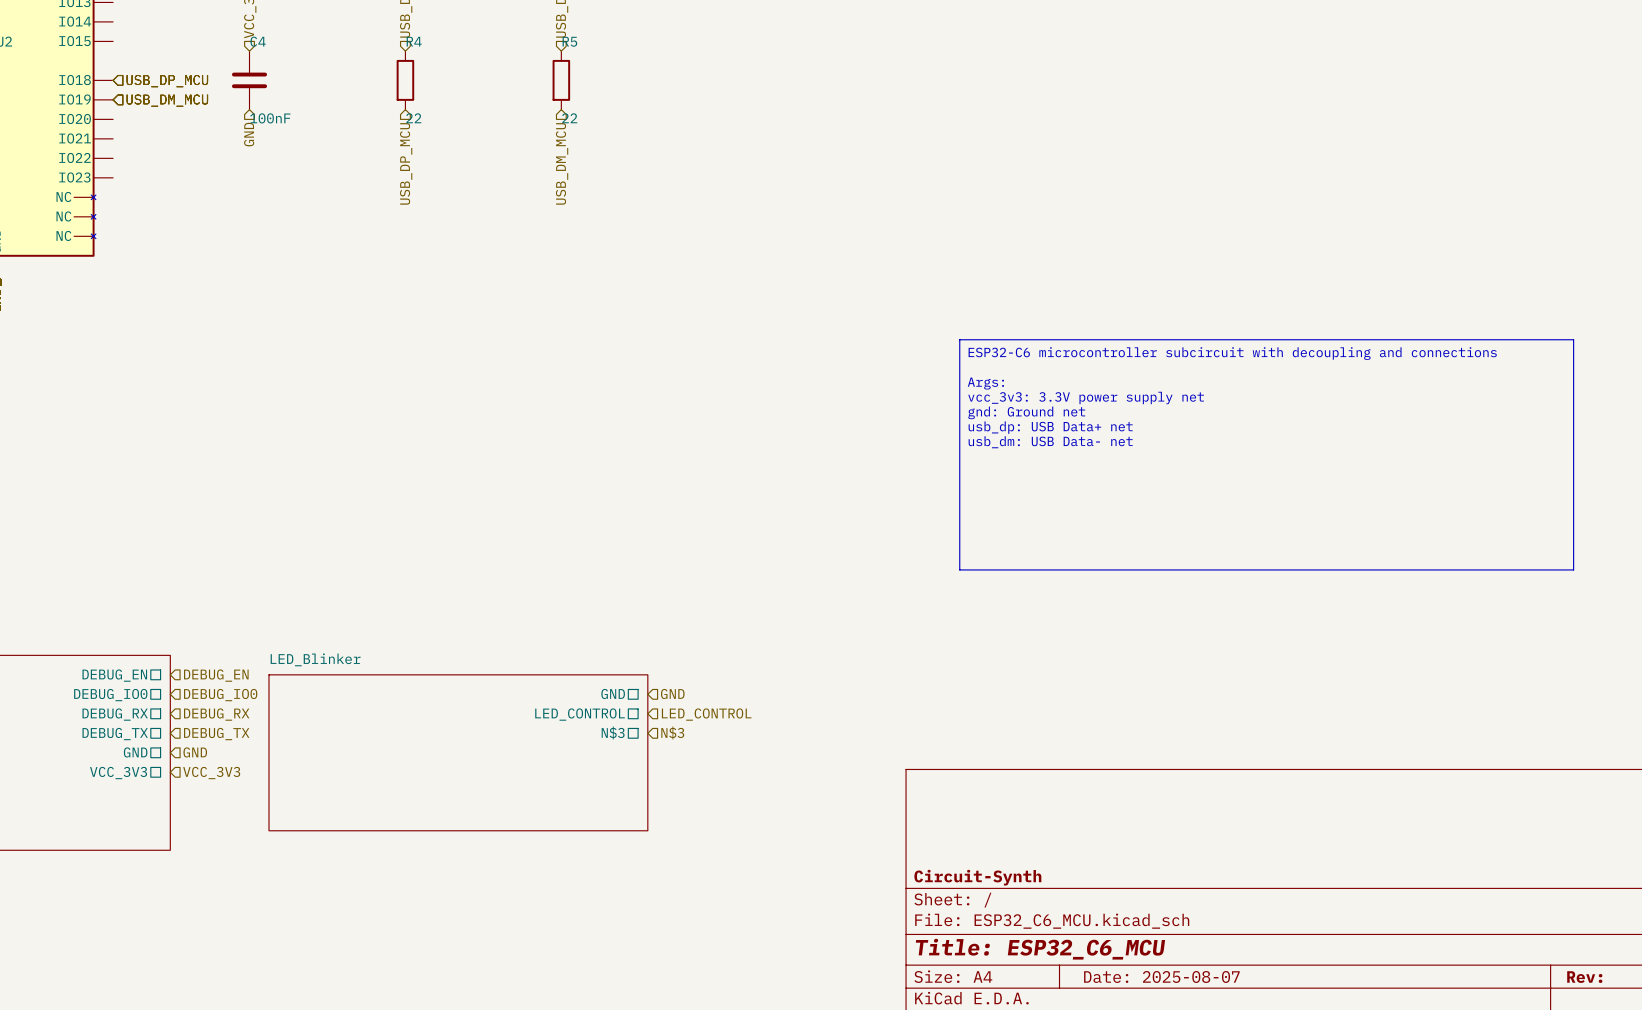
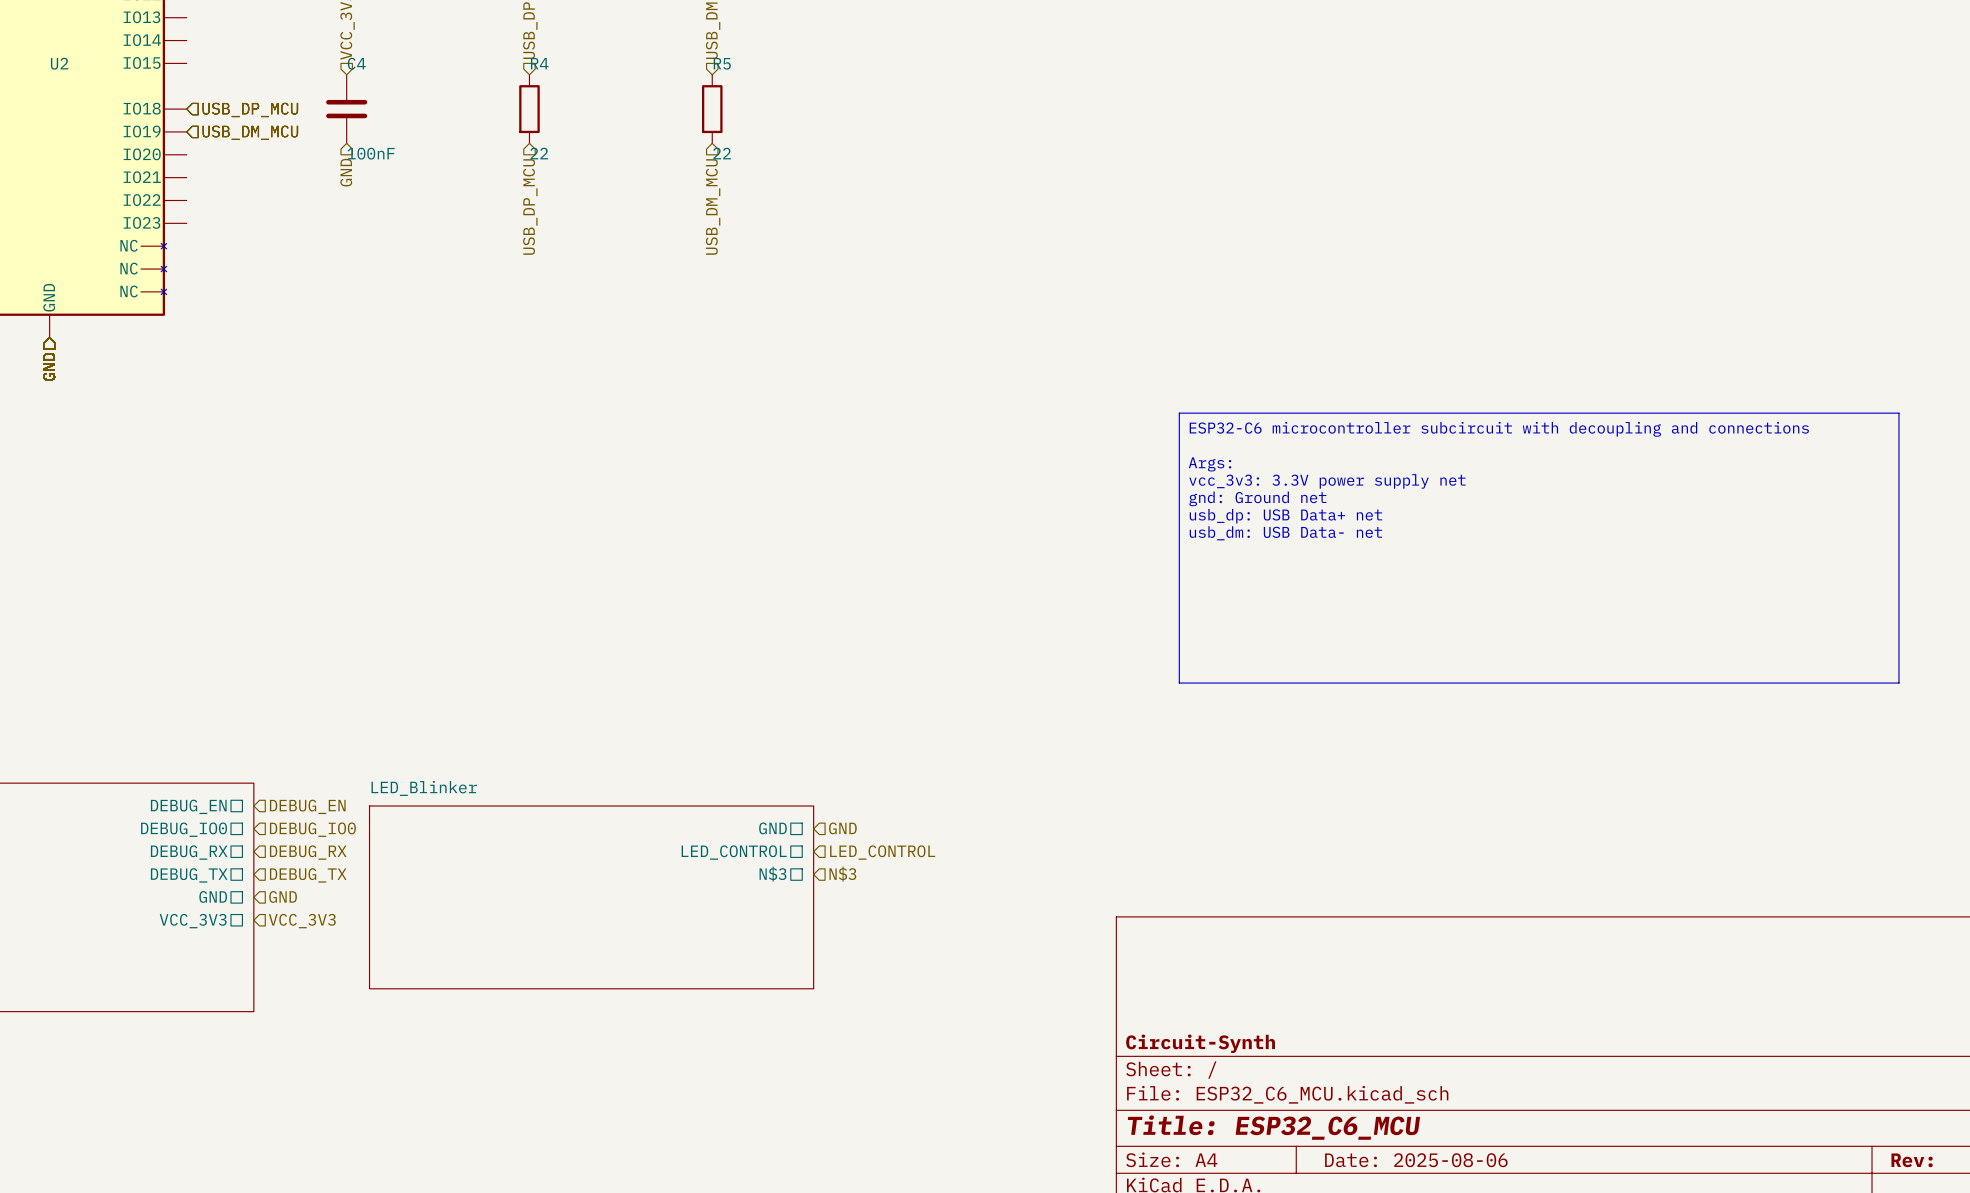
title block: Date: 2025-08-07 (1161, 976) -> Date: 2025-08-06 (1416, 1160)

